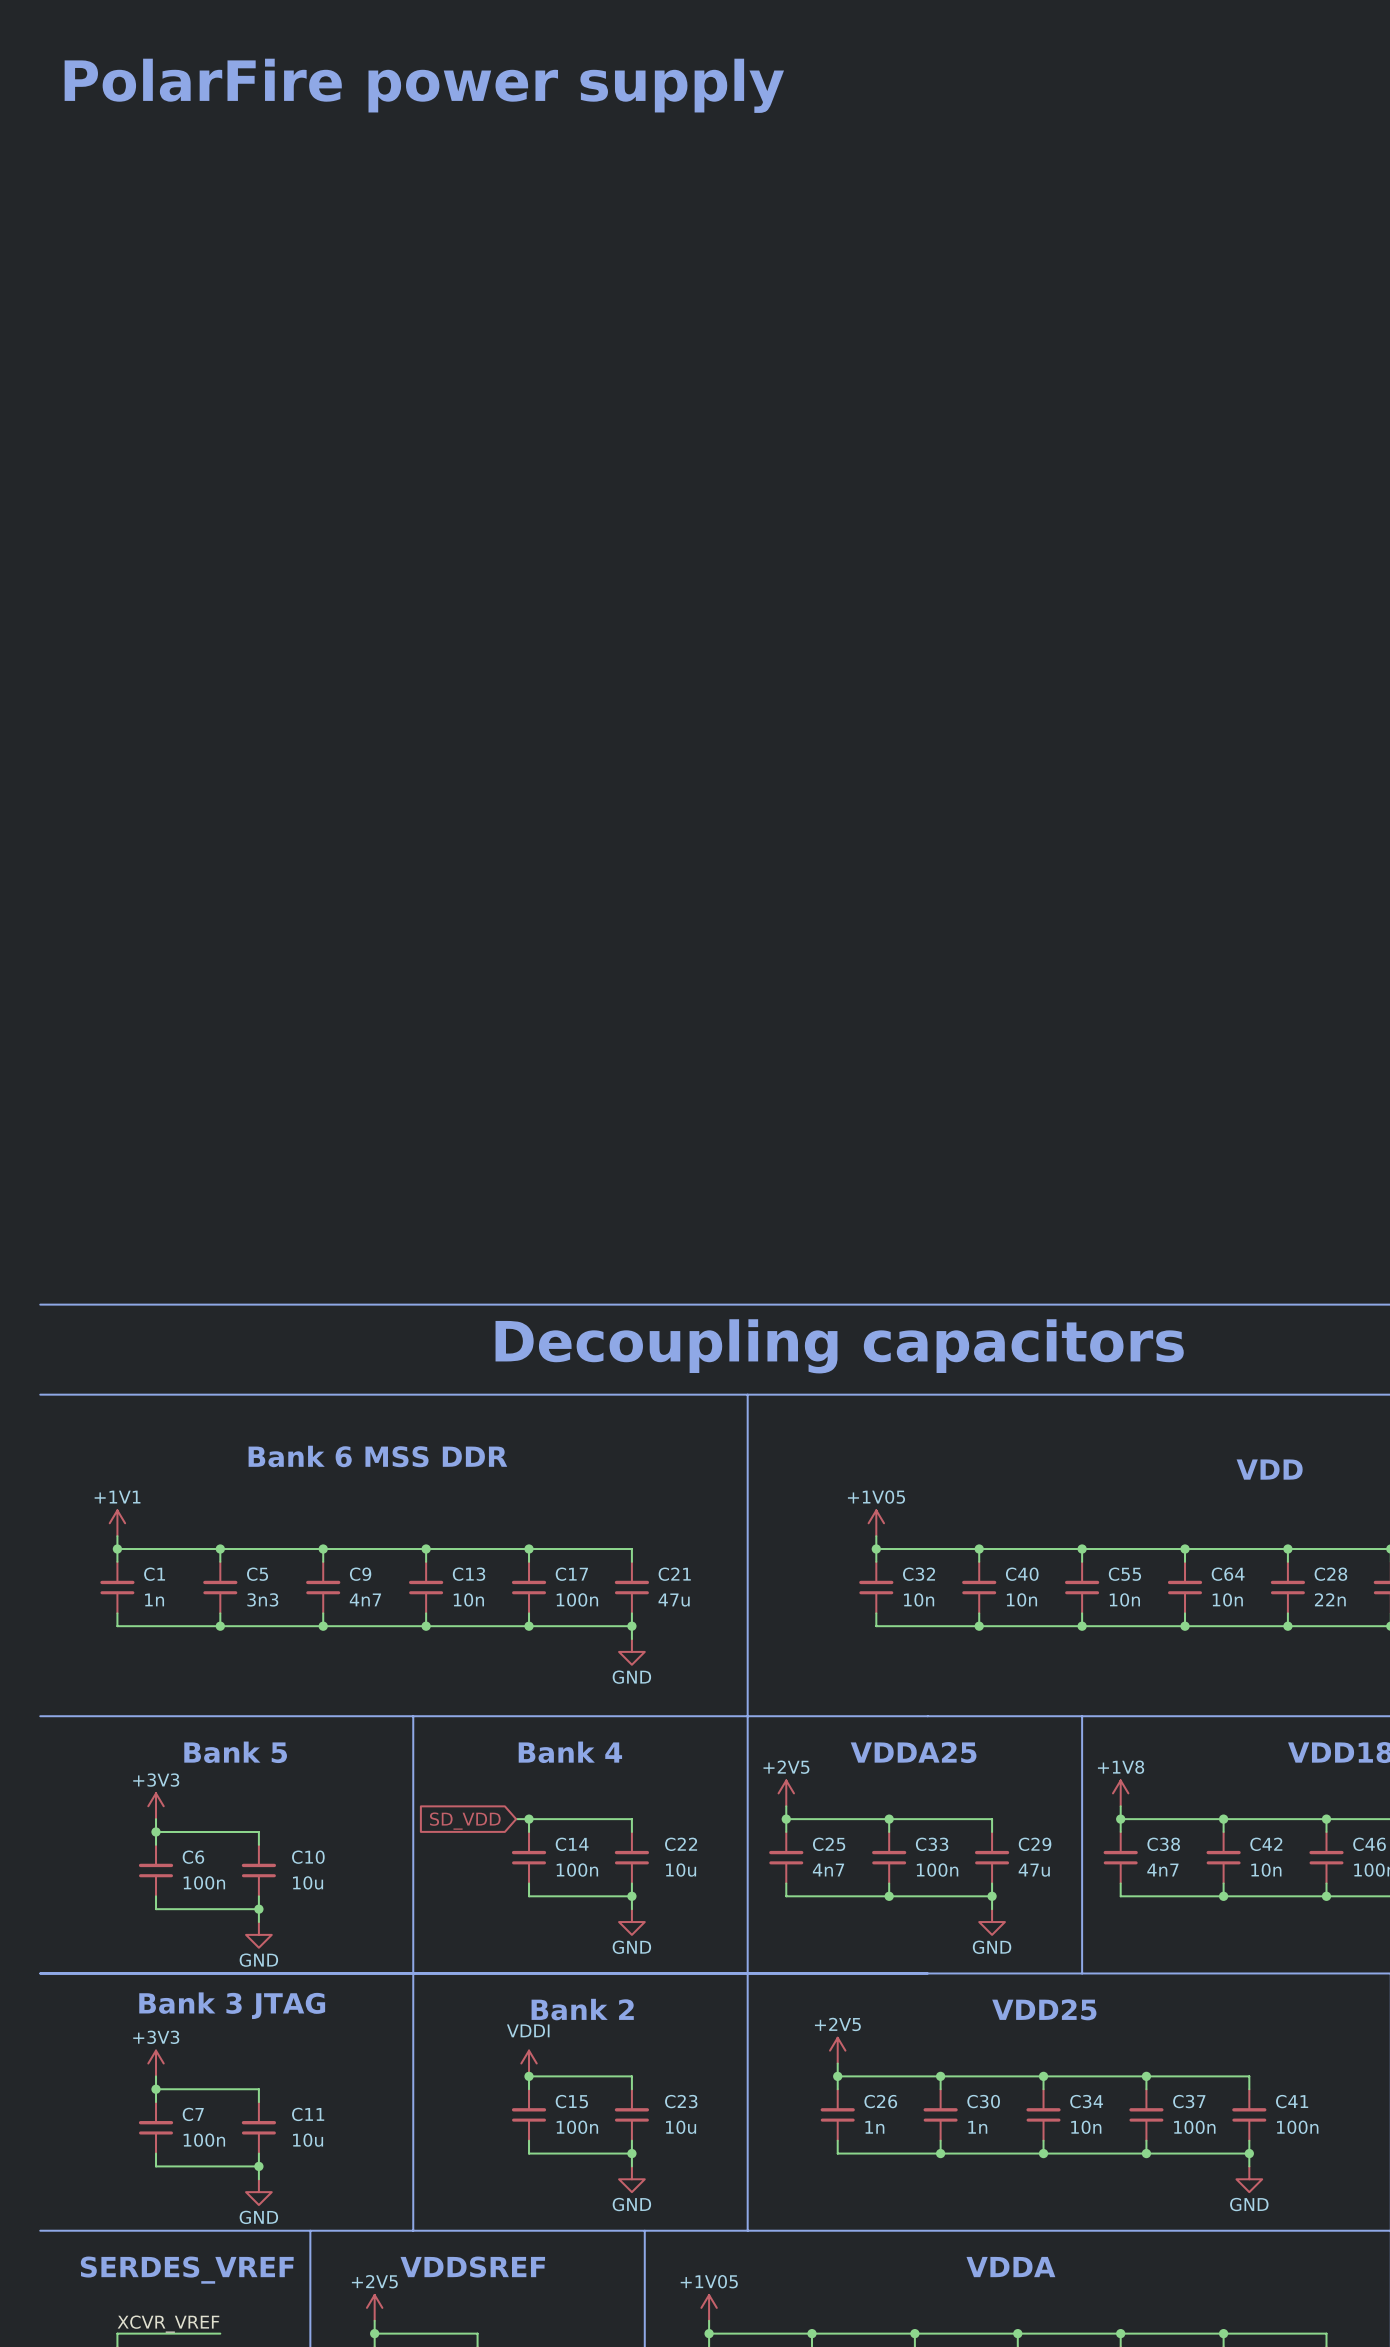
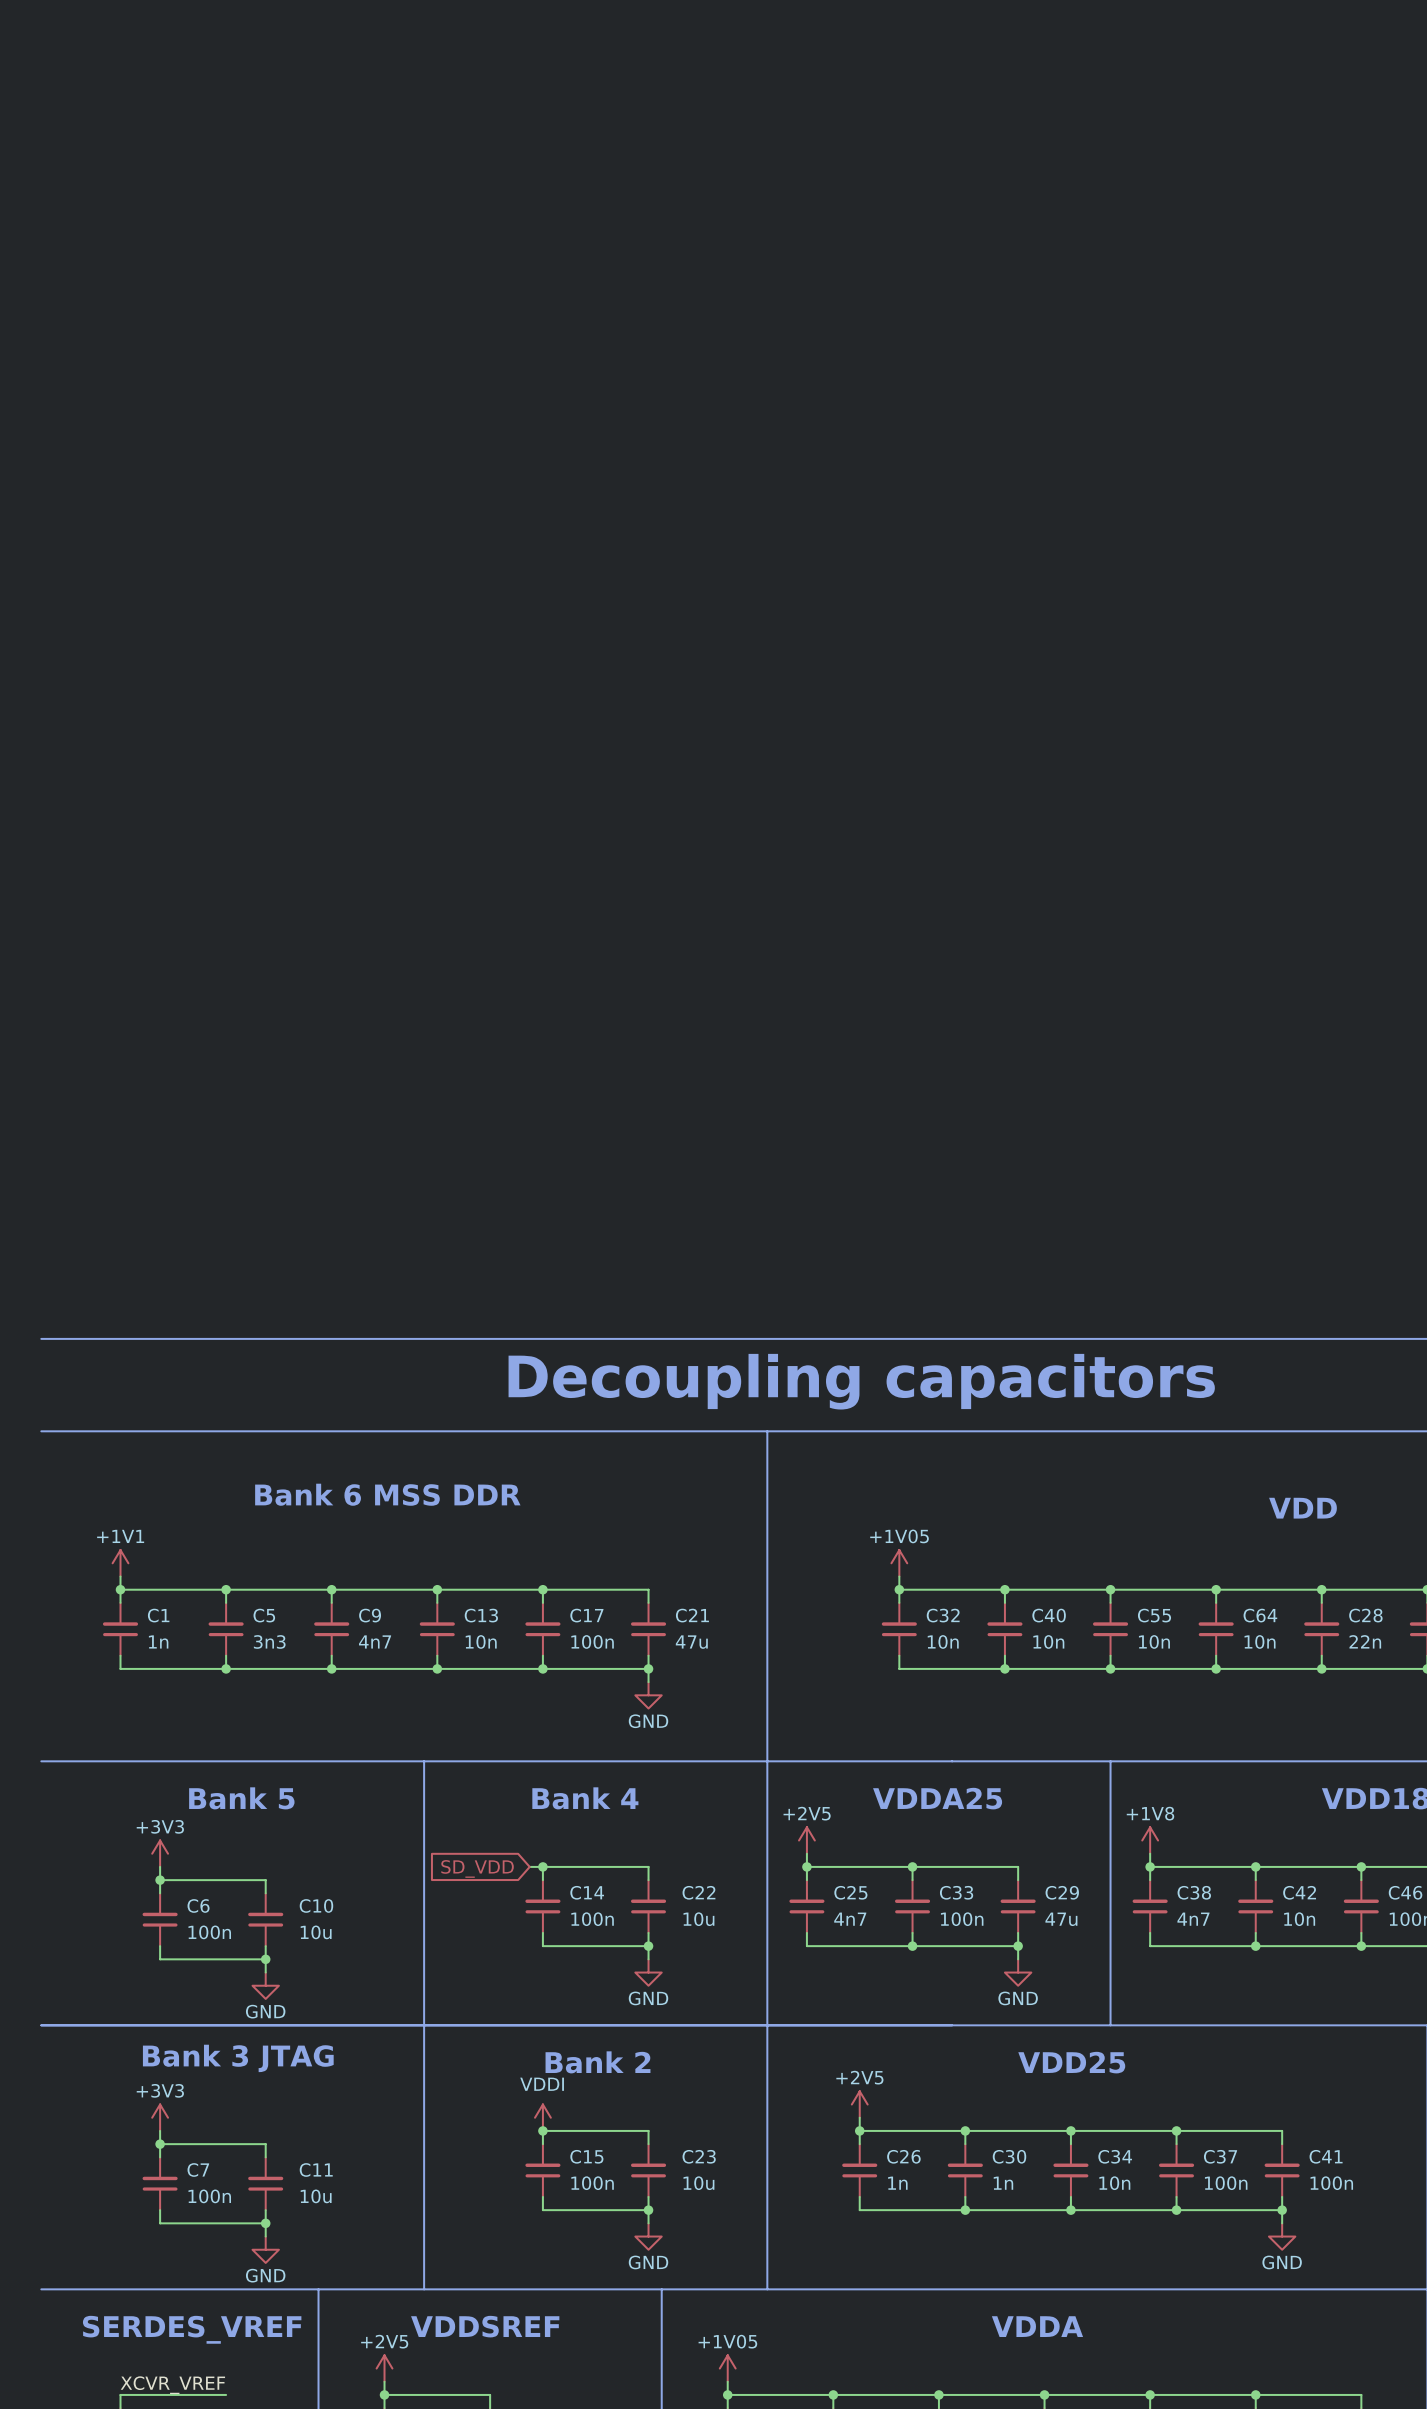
text: PolarFire power supply (424, 85) -> none

